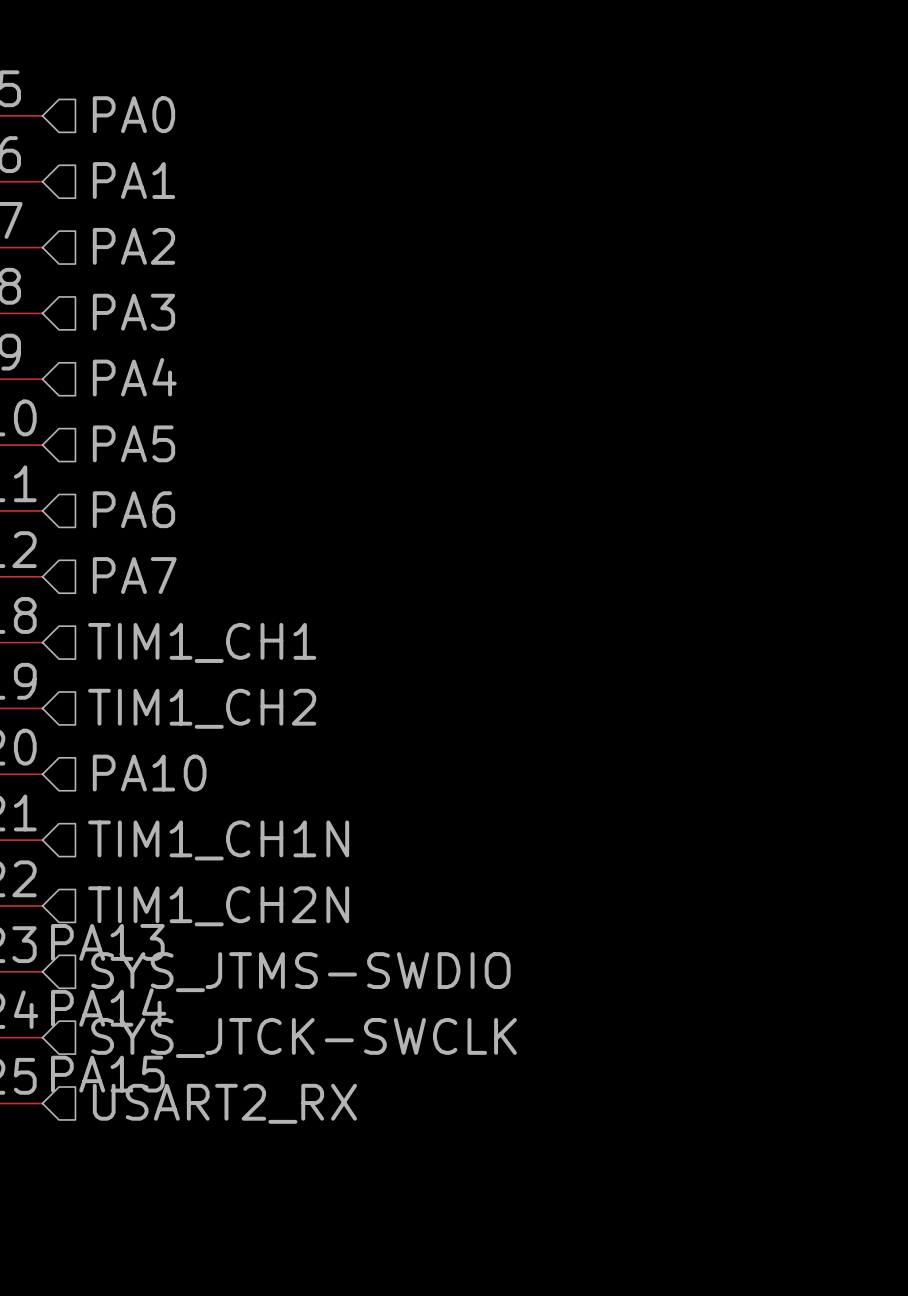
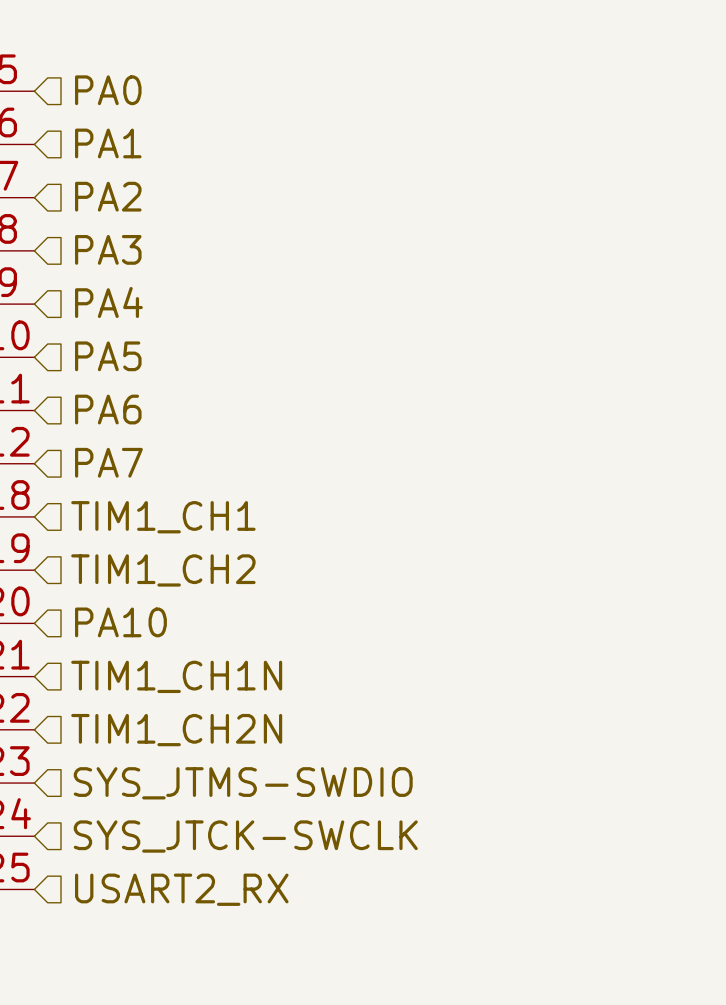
label: PA13 (107, 942) -> none
label: PA14 (108, 1007) -> none
label: PA15 (107, 1074) -> none

